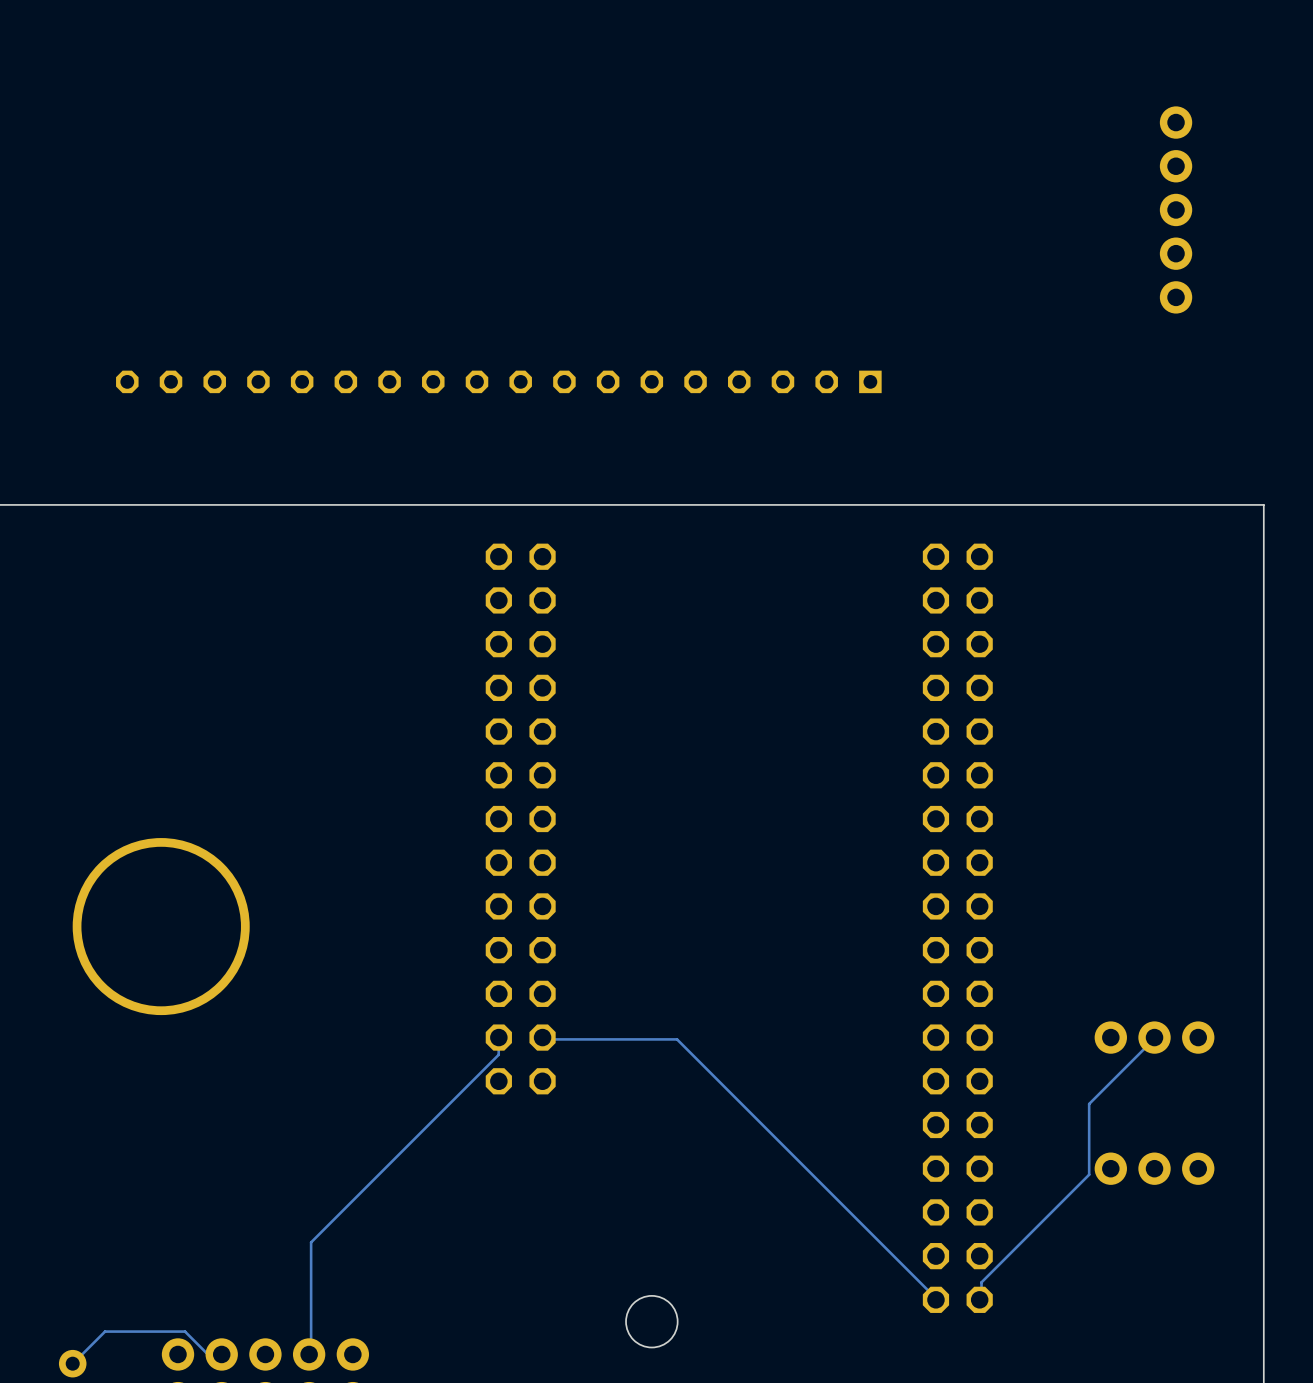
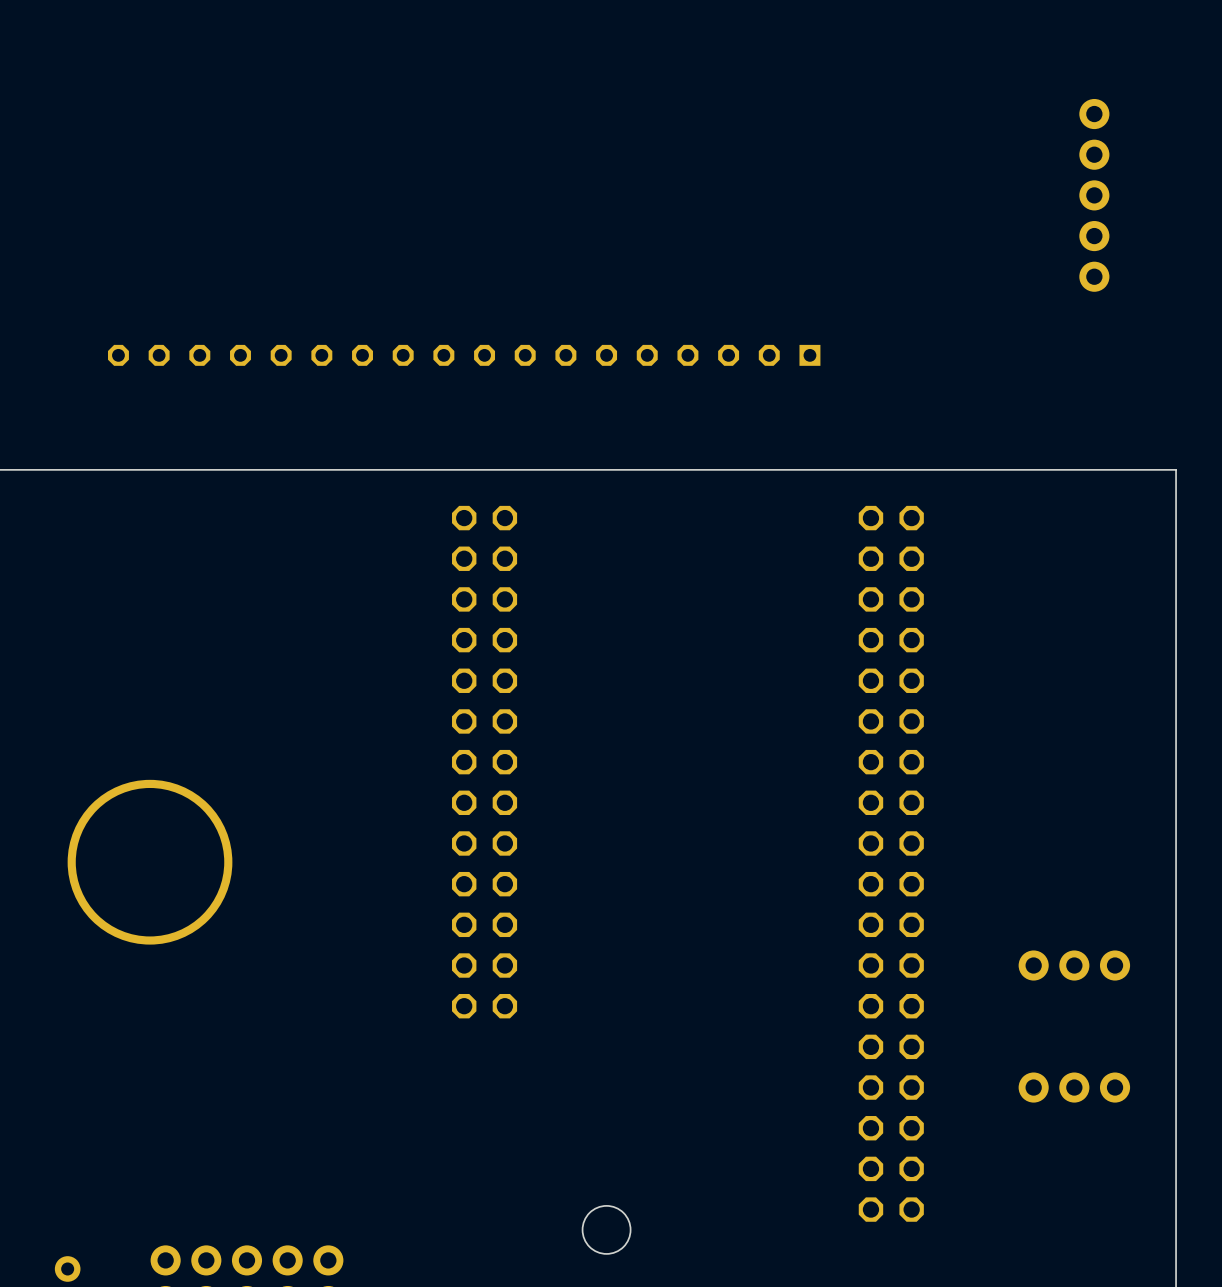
track: (498, 1037) (498, 1054) (311, 1242) (311, 1353) (309, 1354) -> none
track: (542, 1037) (544, 1039) (677, 1039) (935, 1299) -> none
track: (1154, 1037) (1089, 1104) (1089, 1174) (981, 1282) (981, 1297) (979, 1299) -> none
track: (221, 1354) (206, 1353) (185, 1331) (105, 1331) (72, 1363) -> none

